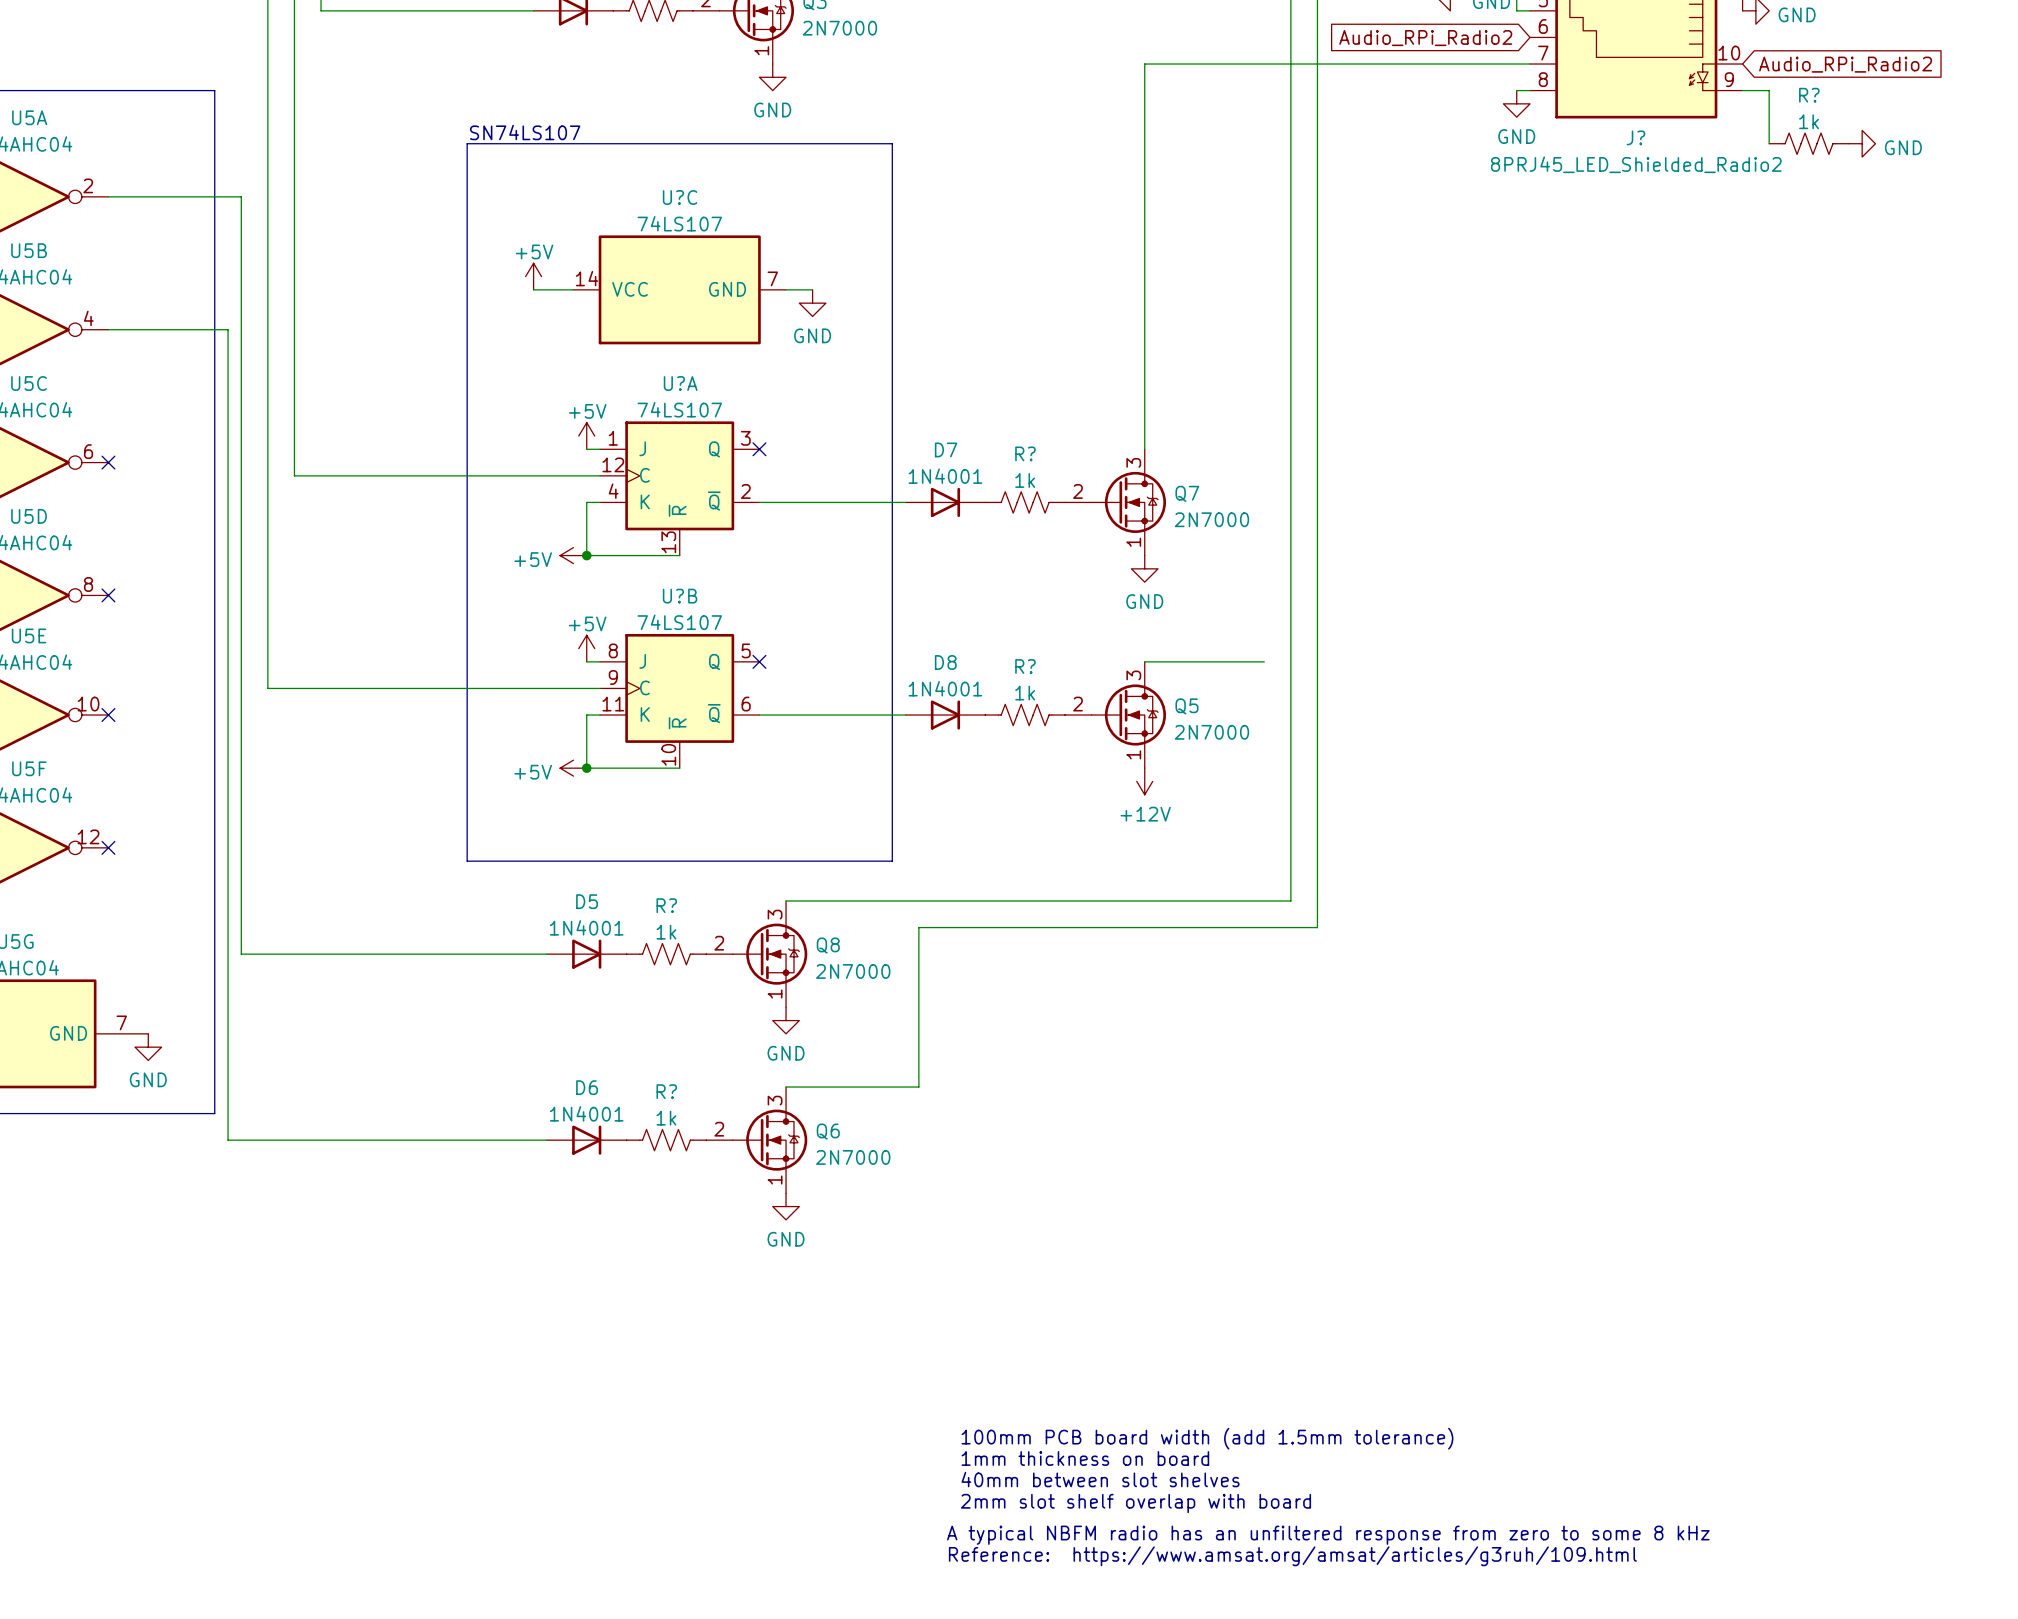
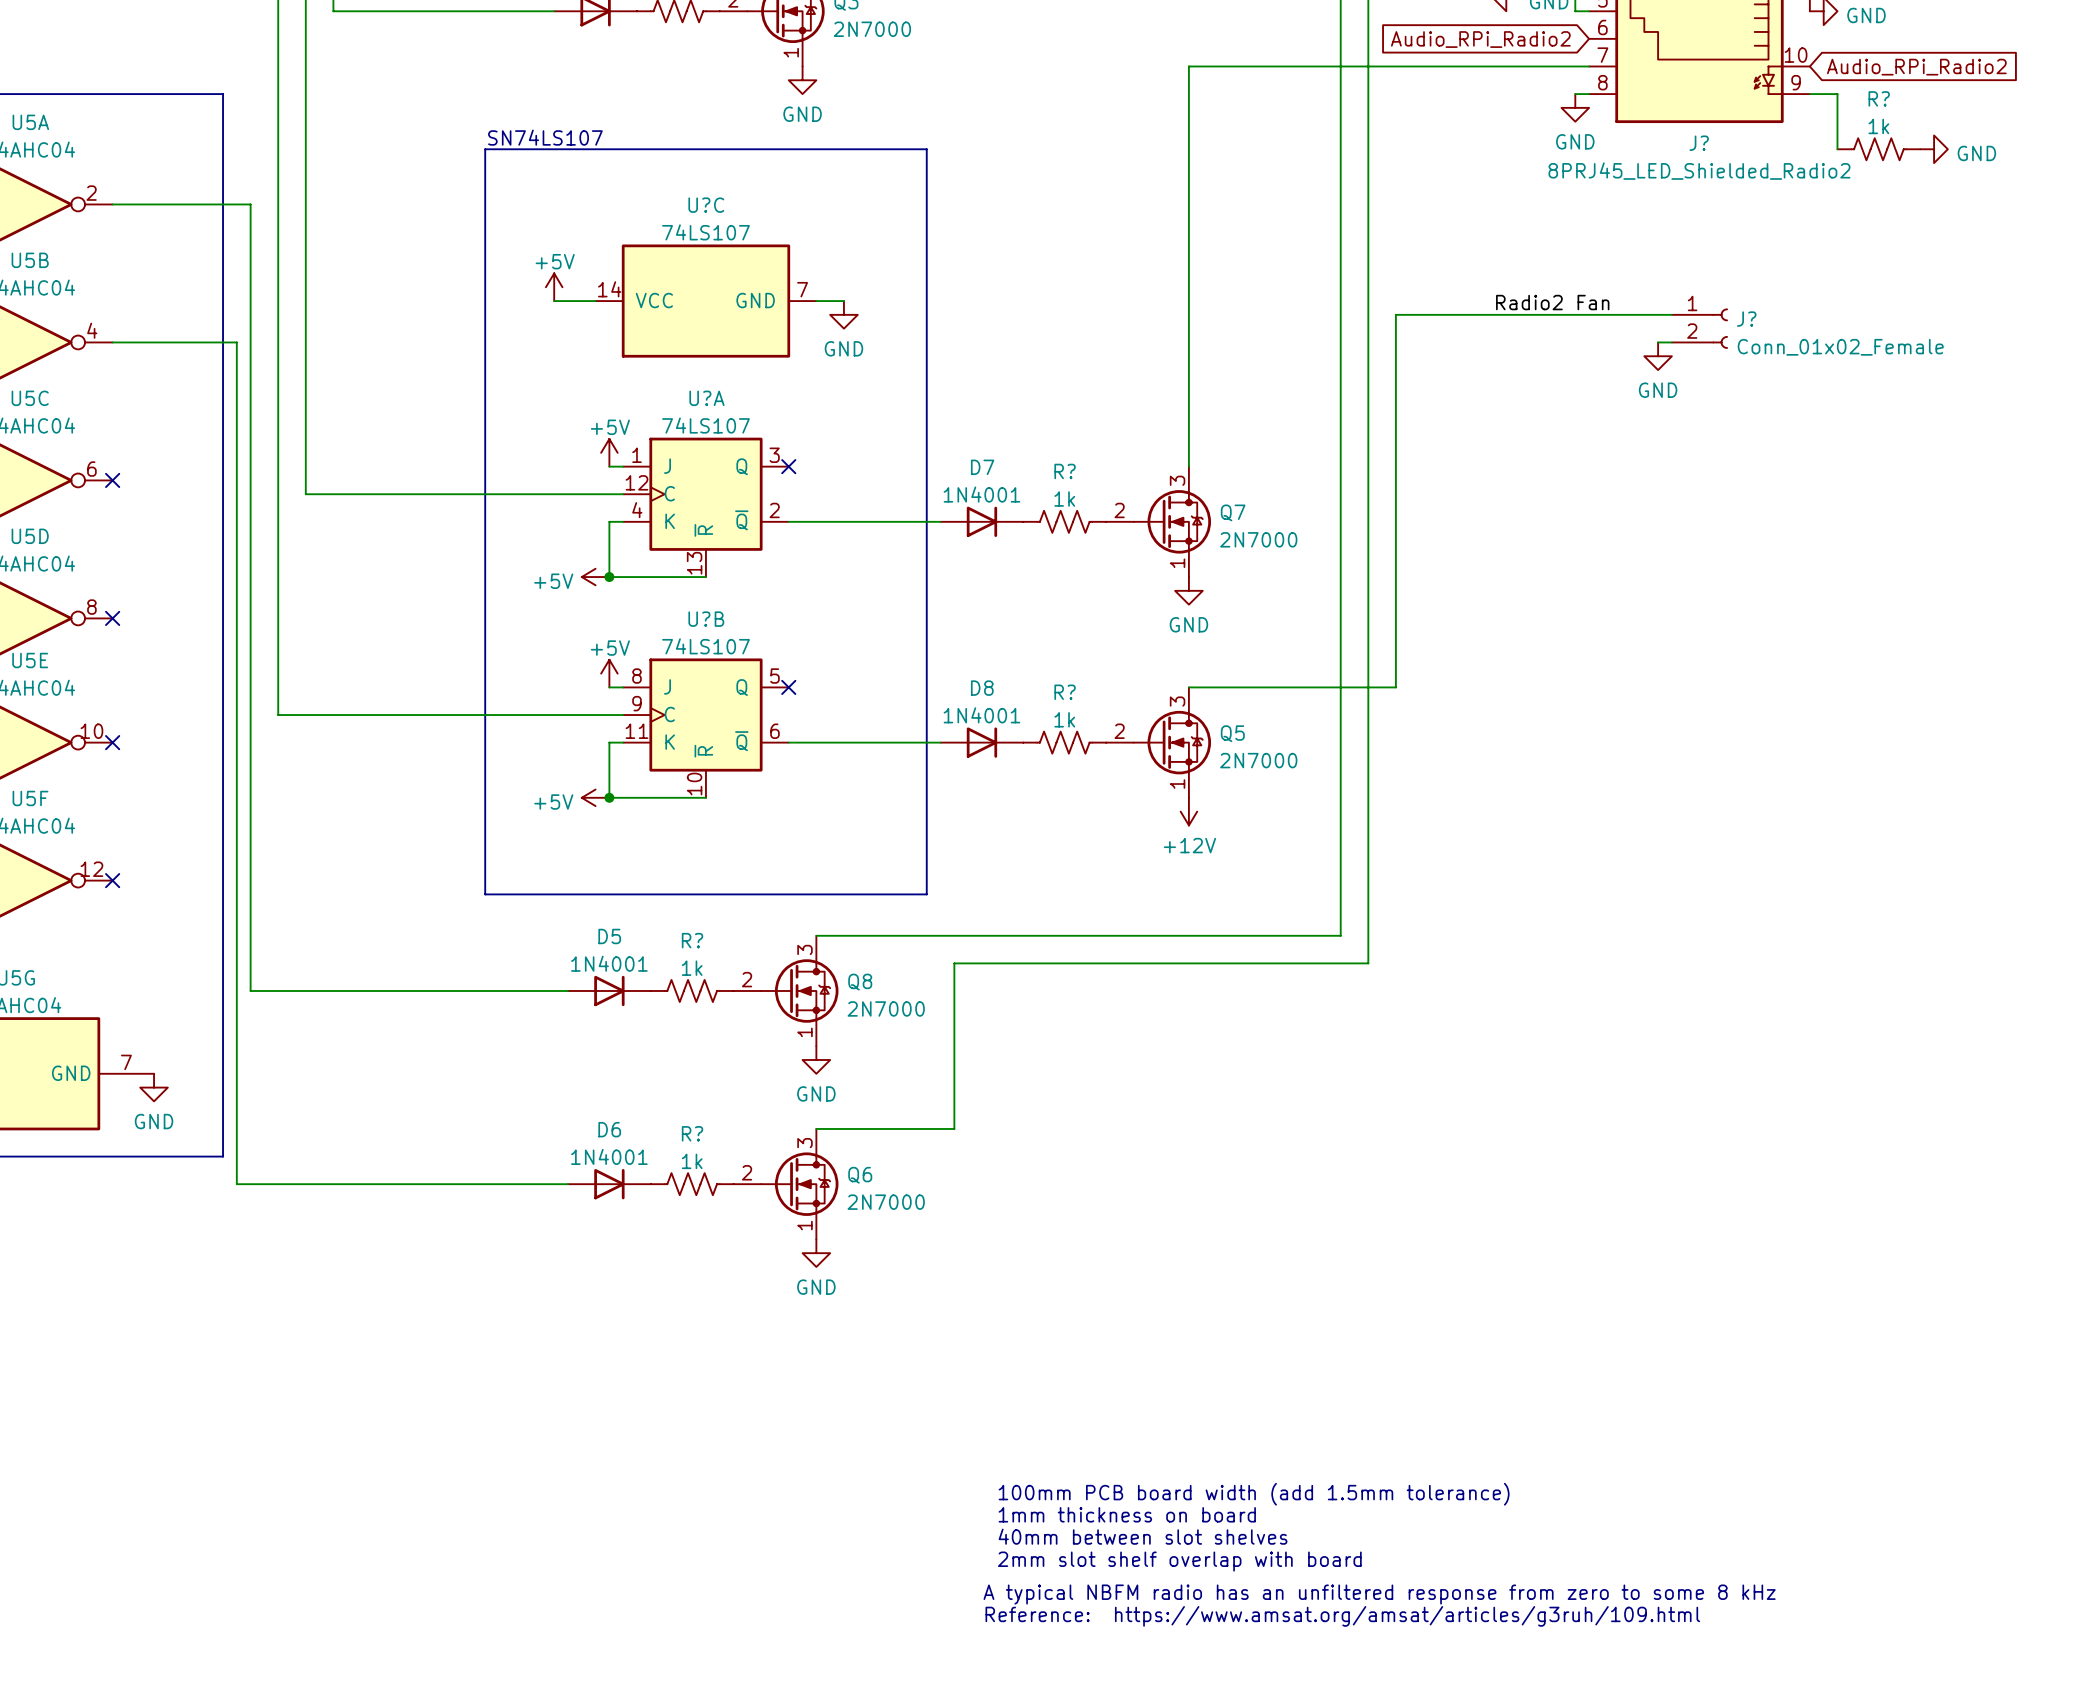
label: none -> Radio2 Fan (1552, 302)
wire: none -> (1671, 314) (1395, 314) (1395, 687) (1313, 687)
J?: none -> Conn_01x02_Female (1699, 328)
wire: none -> (1658, 342) (1671, 342)
power symbol: none -> GND (1658, 356)

